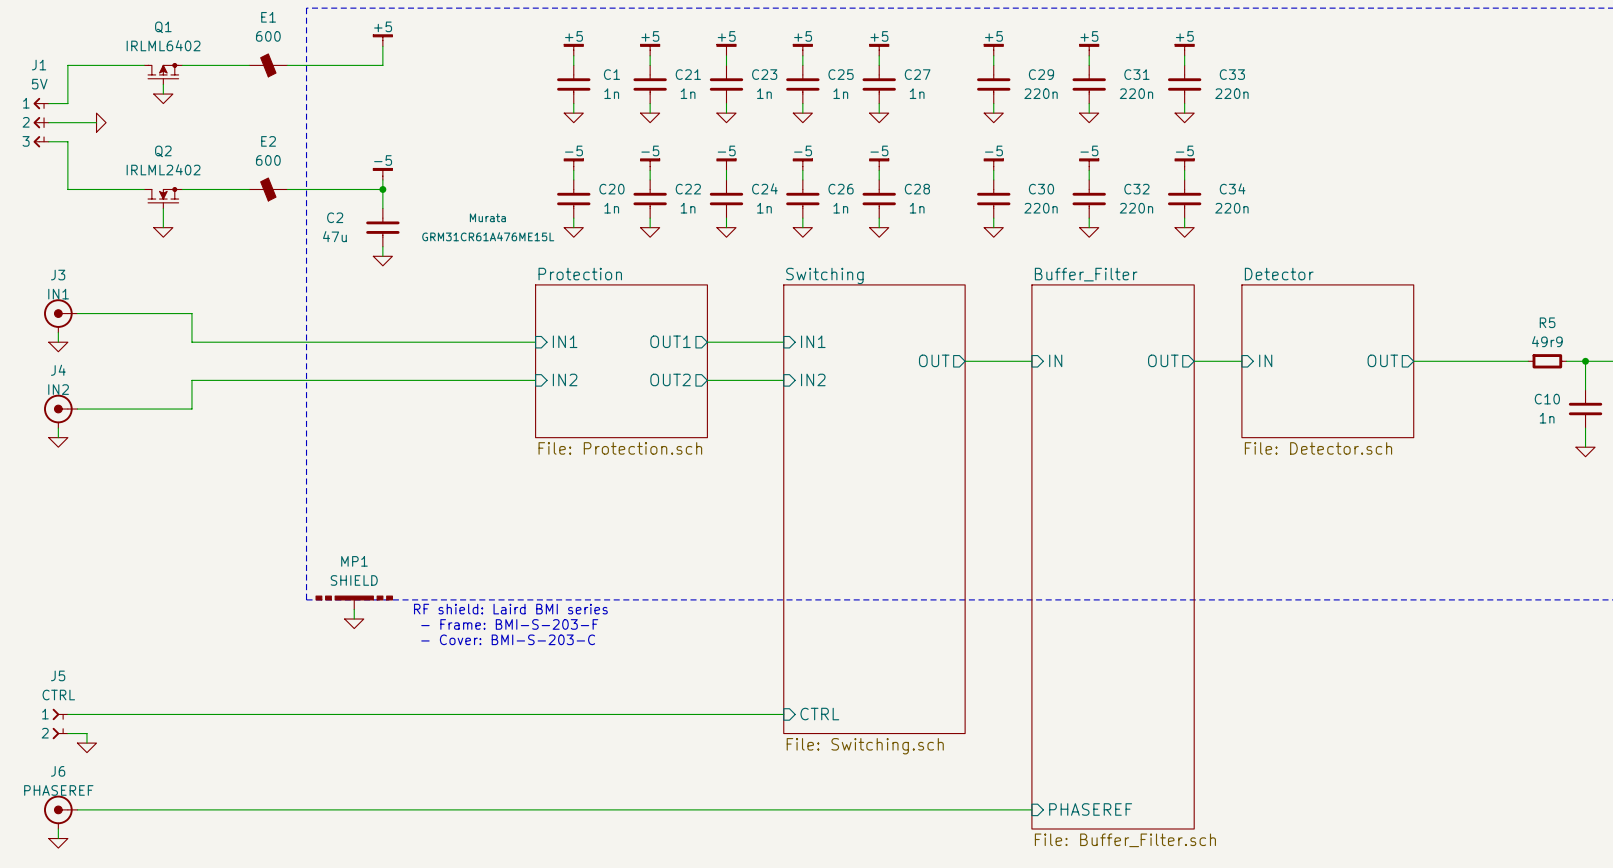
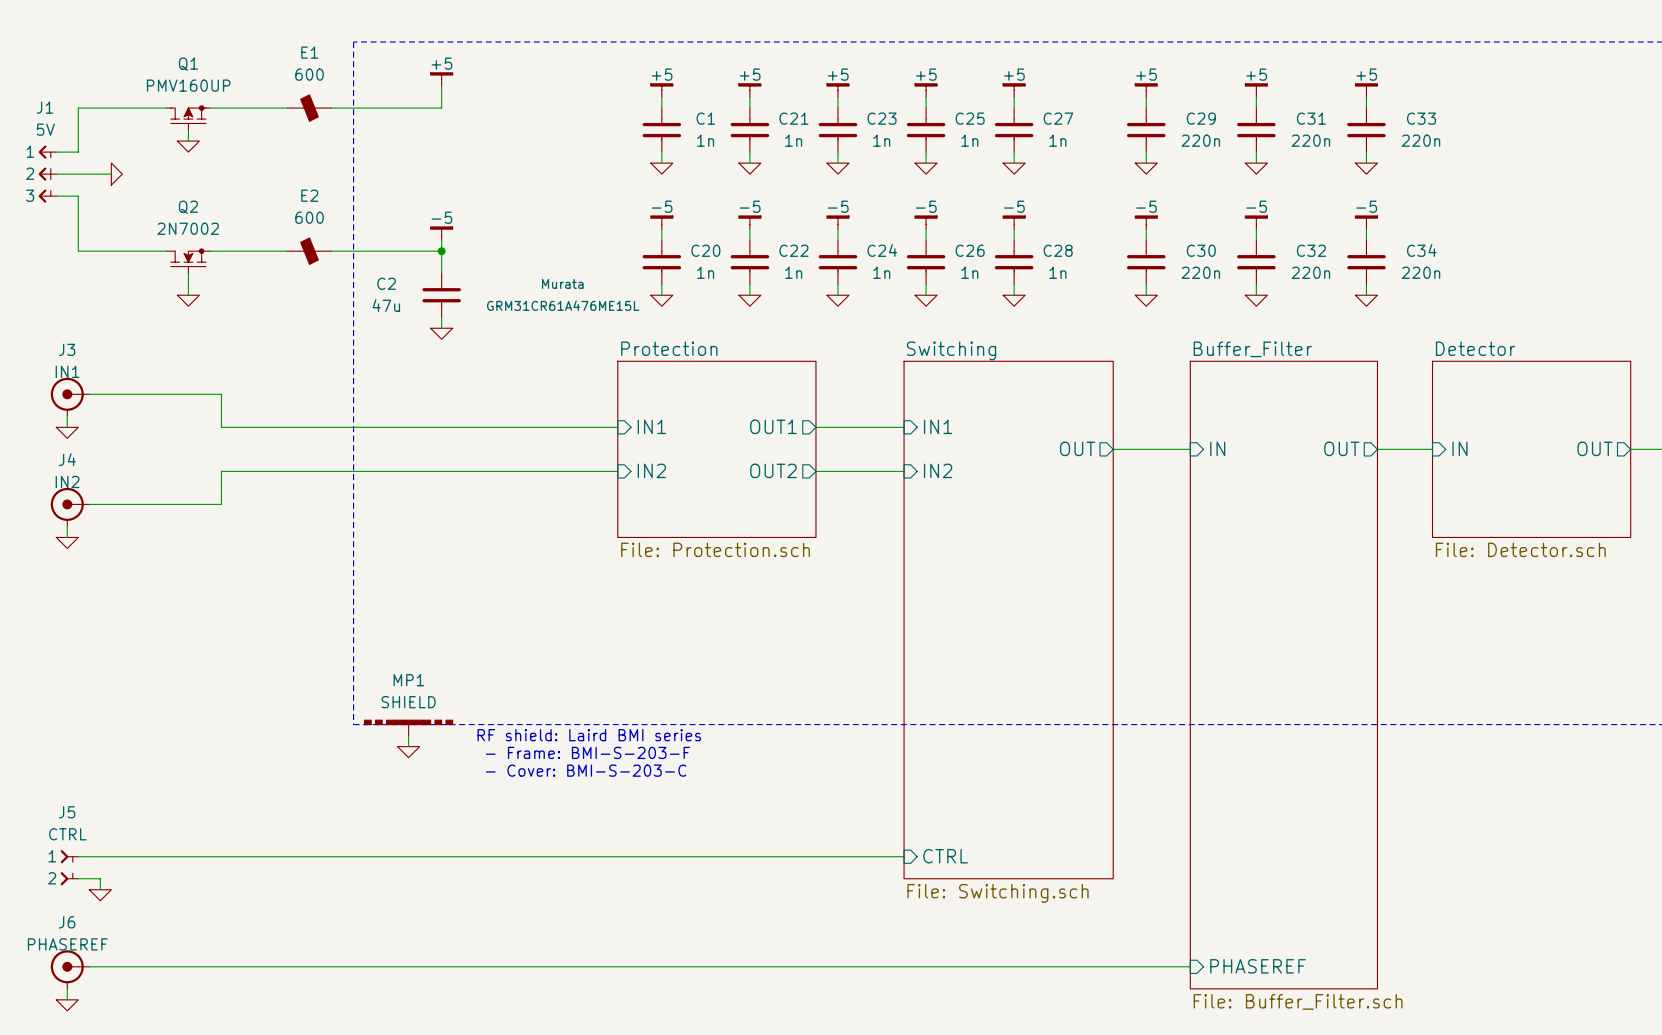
Q1 value: IRLML6402 (163, 45) -> PMV160UP (188, 85)
Q2 value: IRLML2402 (163, 169) -> 2N7002 (188, 228)

